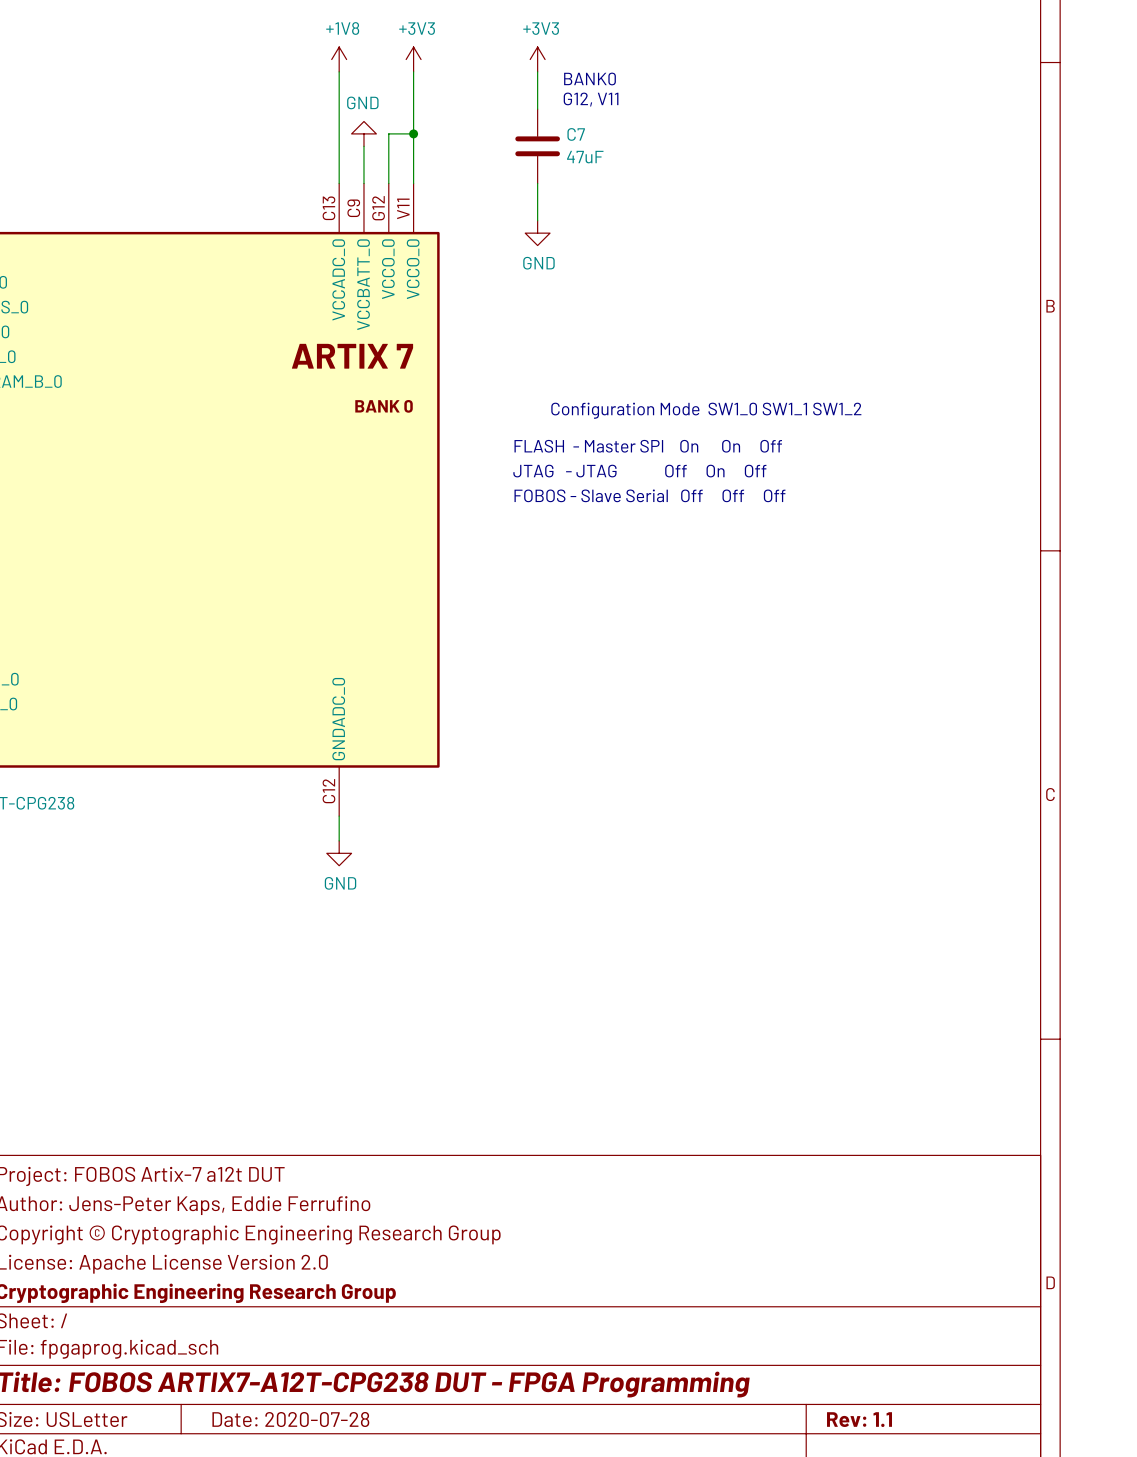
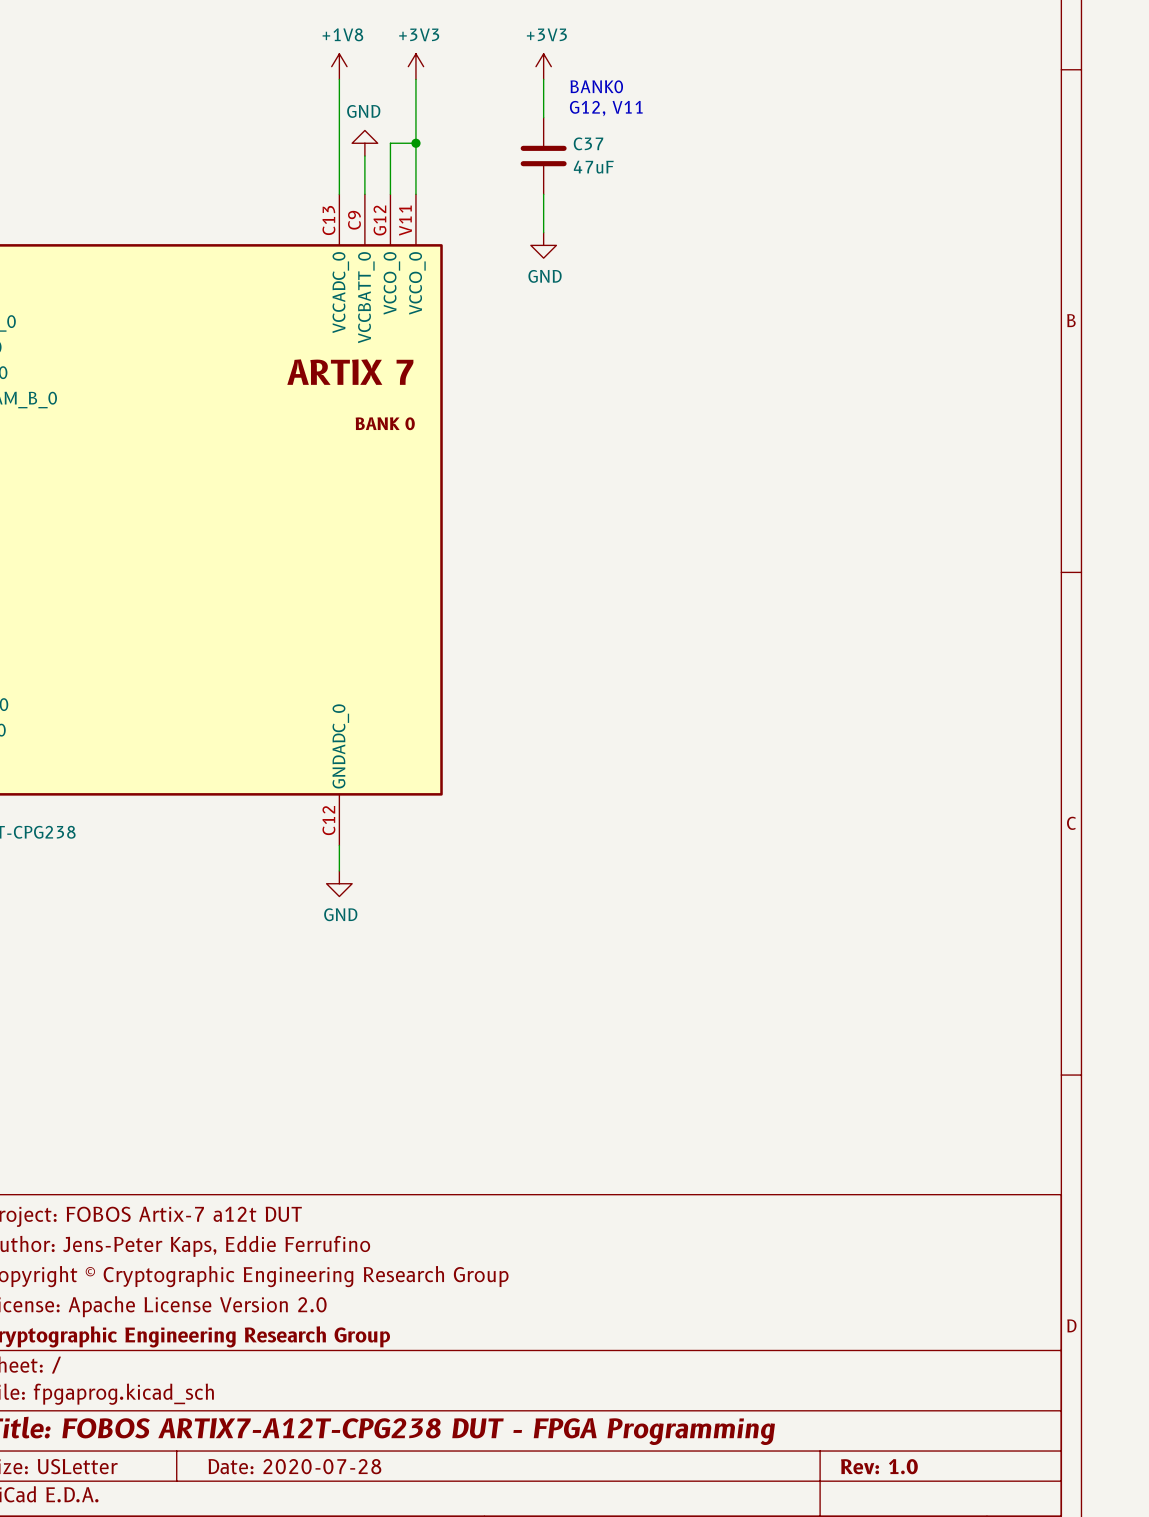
C7 name: C7 (576, 134) -> C37 (588, 143)
text: Configuration Mode SW1_0 SW1_1 SW1_2 (706, 410) -> none
text: FLASH - Master SPI On On Off (648, 446) -> none
text: JTAG - JTAG Off On Off (639, 471) -> none
text: FOBOS - Slave Serial Off Off Off (649, 495) -> none
title block: Rev: 1.1 (859, 1419) -> Rev: 1.0 (879, 1466)

